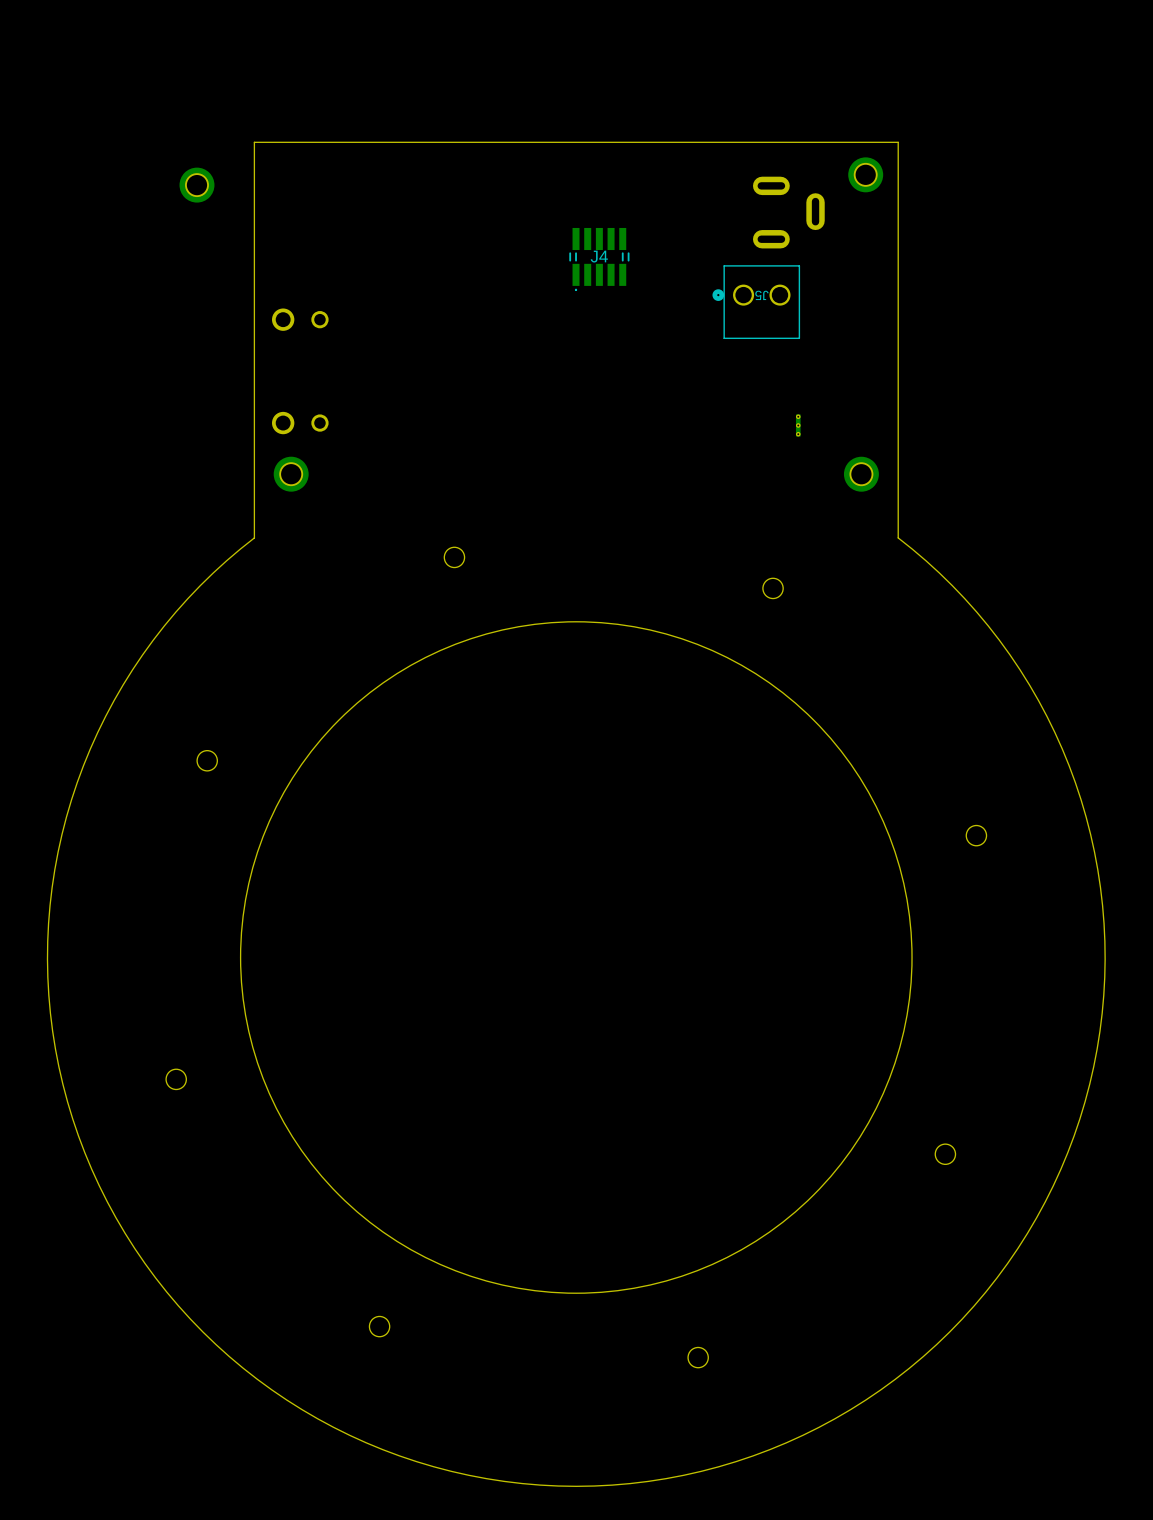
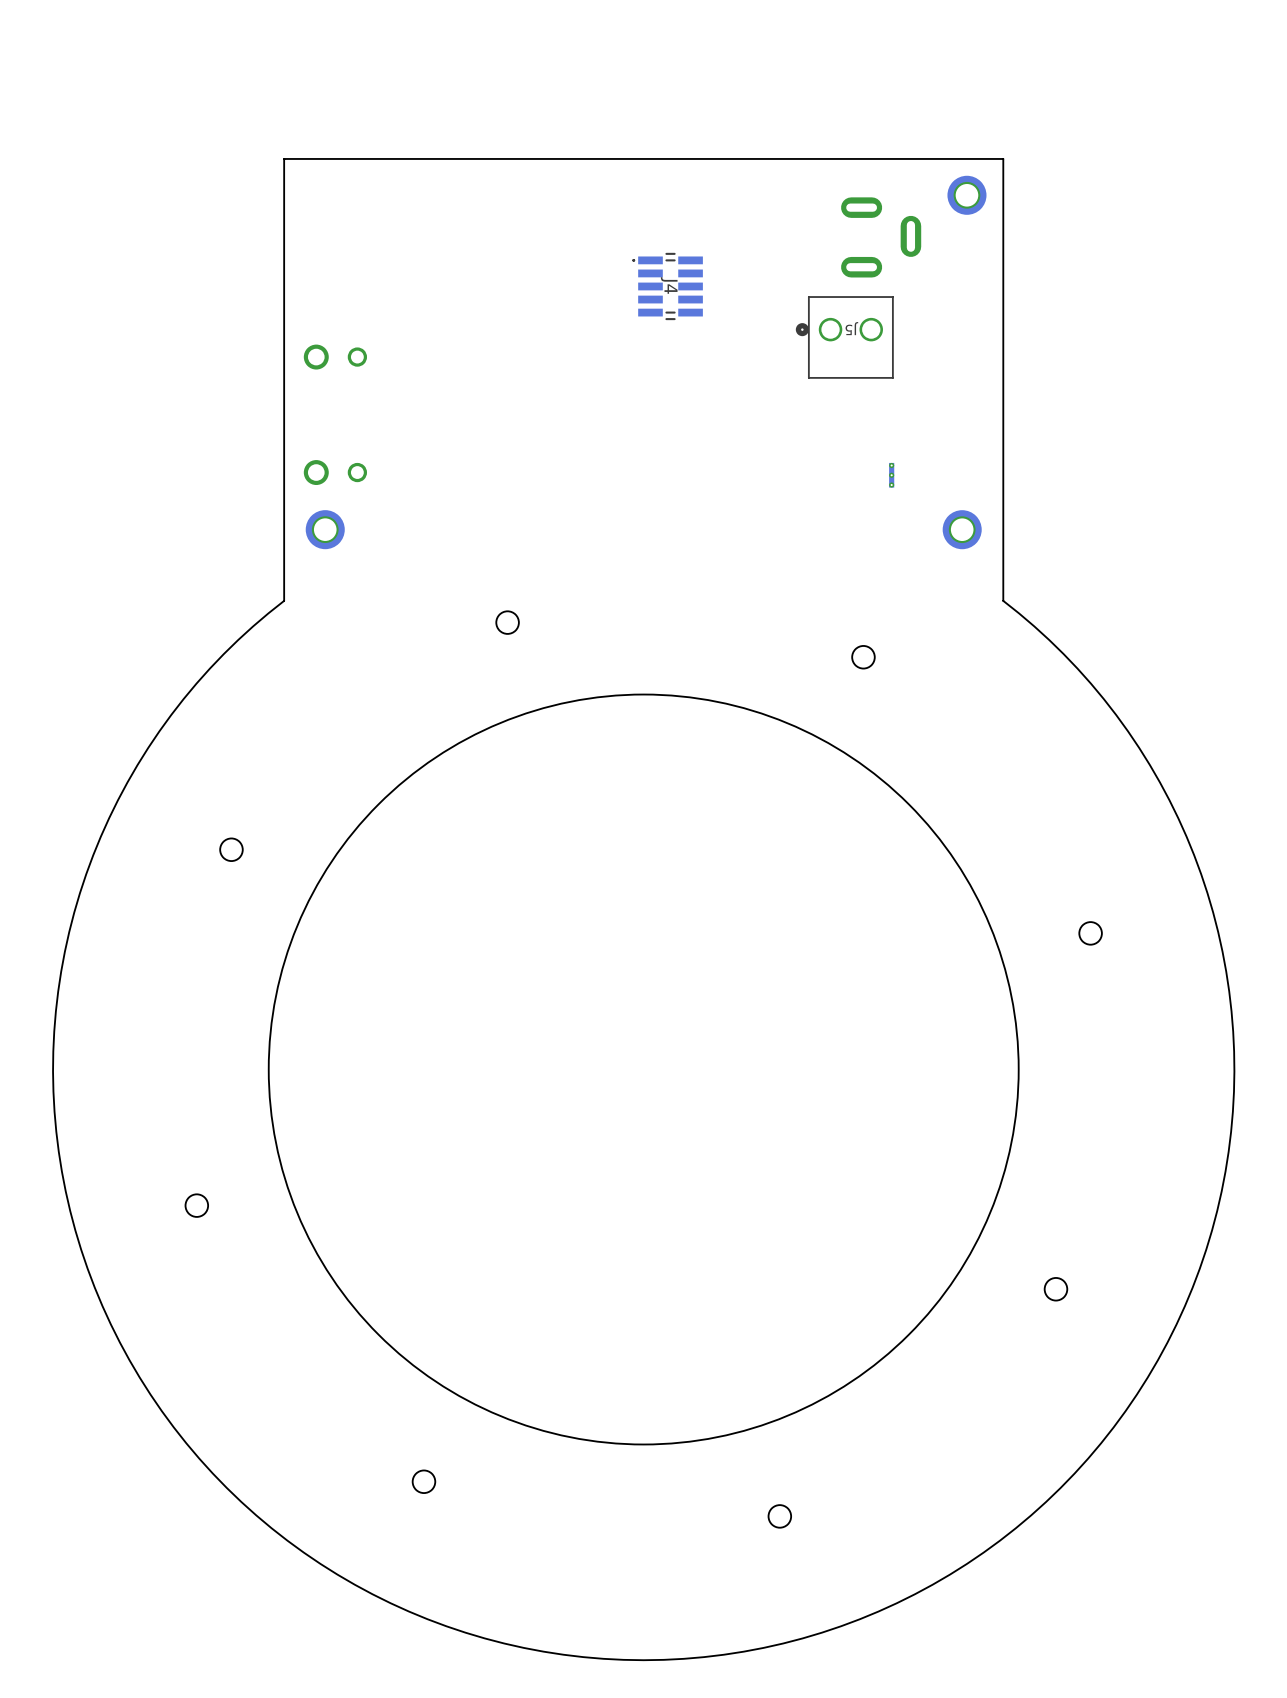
part: (196, 185) -> none
J4 rotation: 0° (599, 259) -> 90° clockwise (667, 286)

